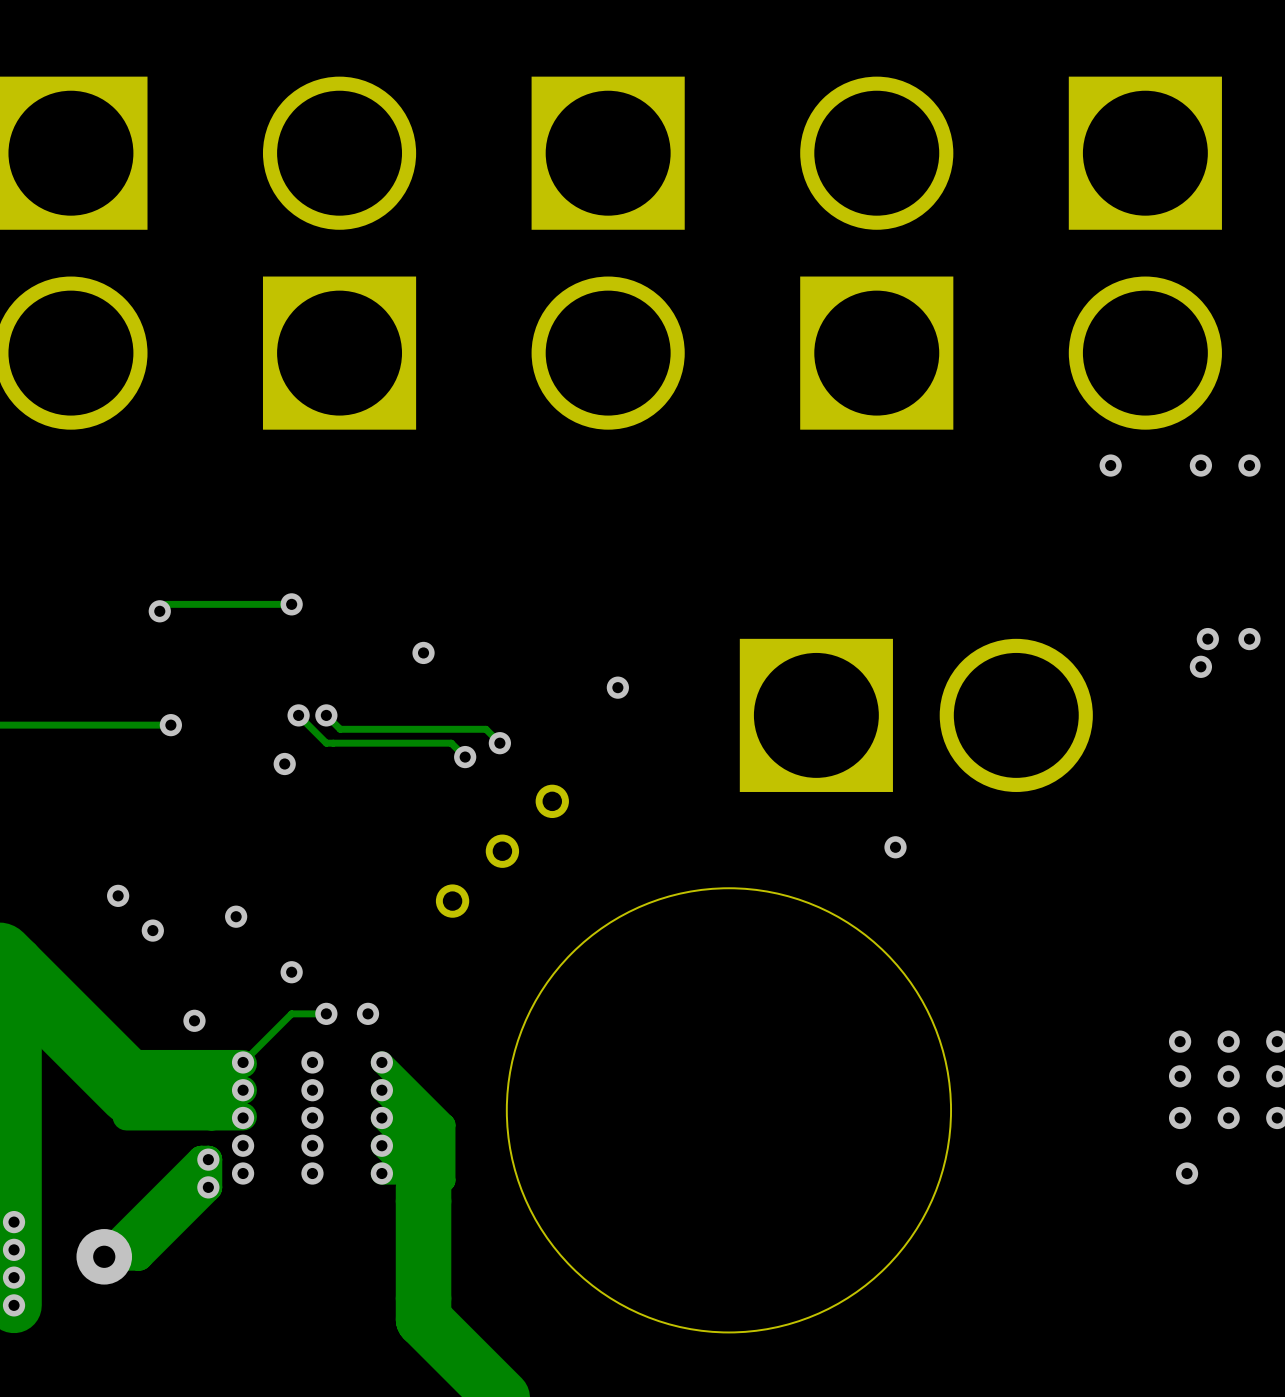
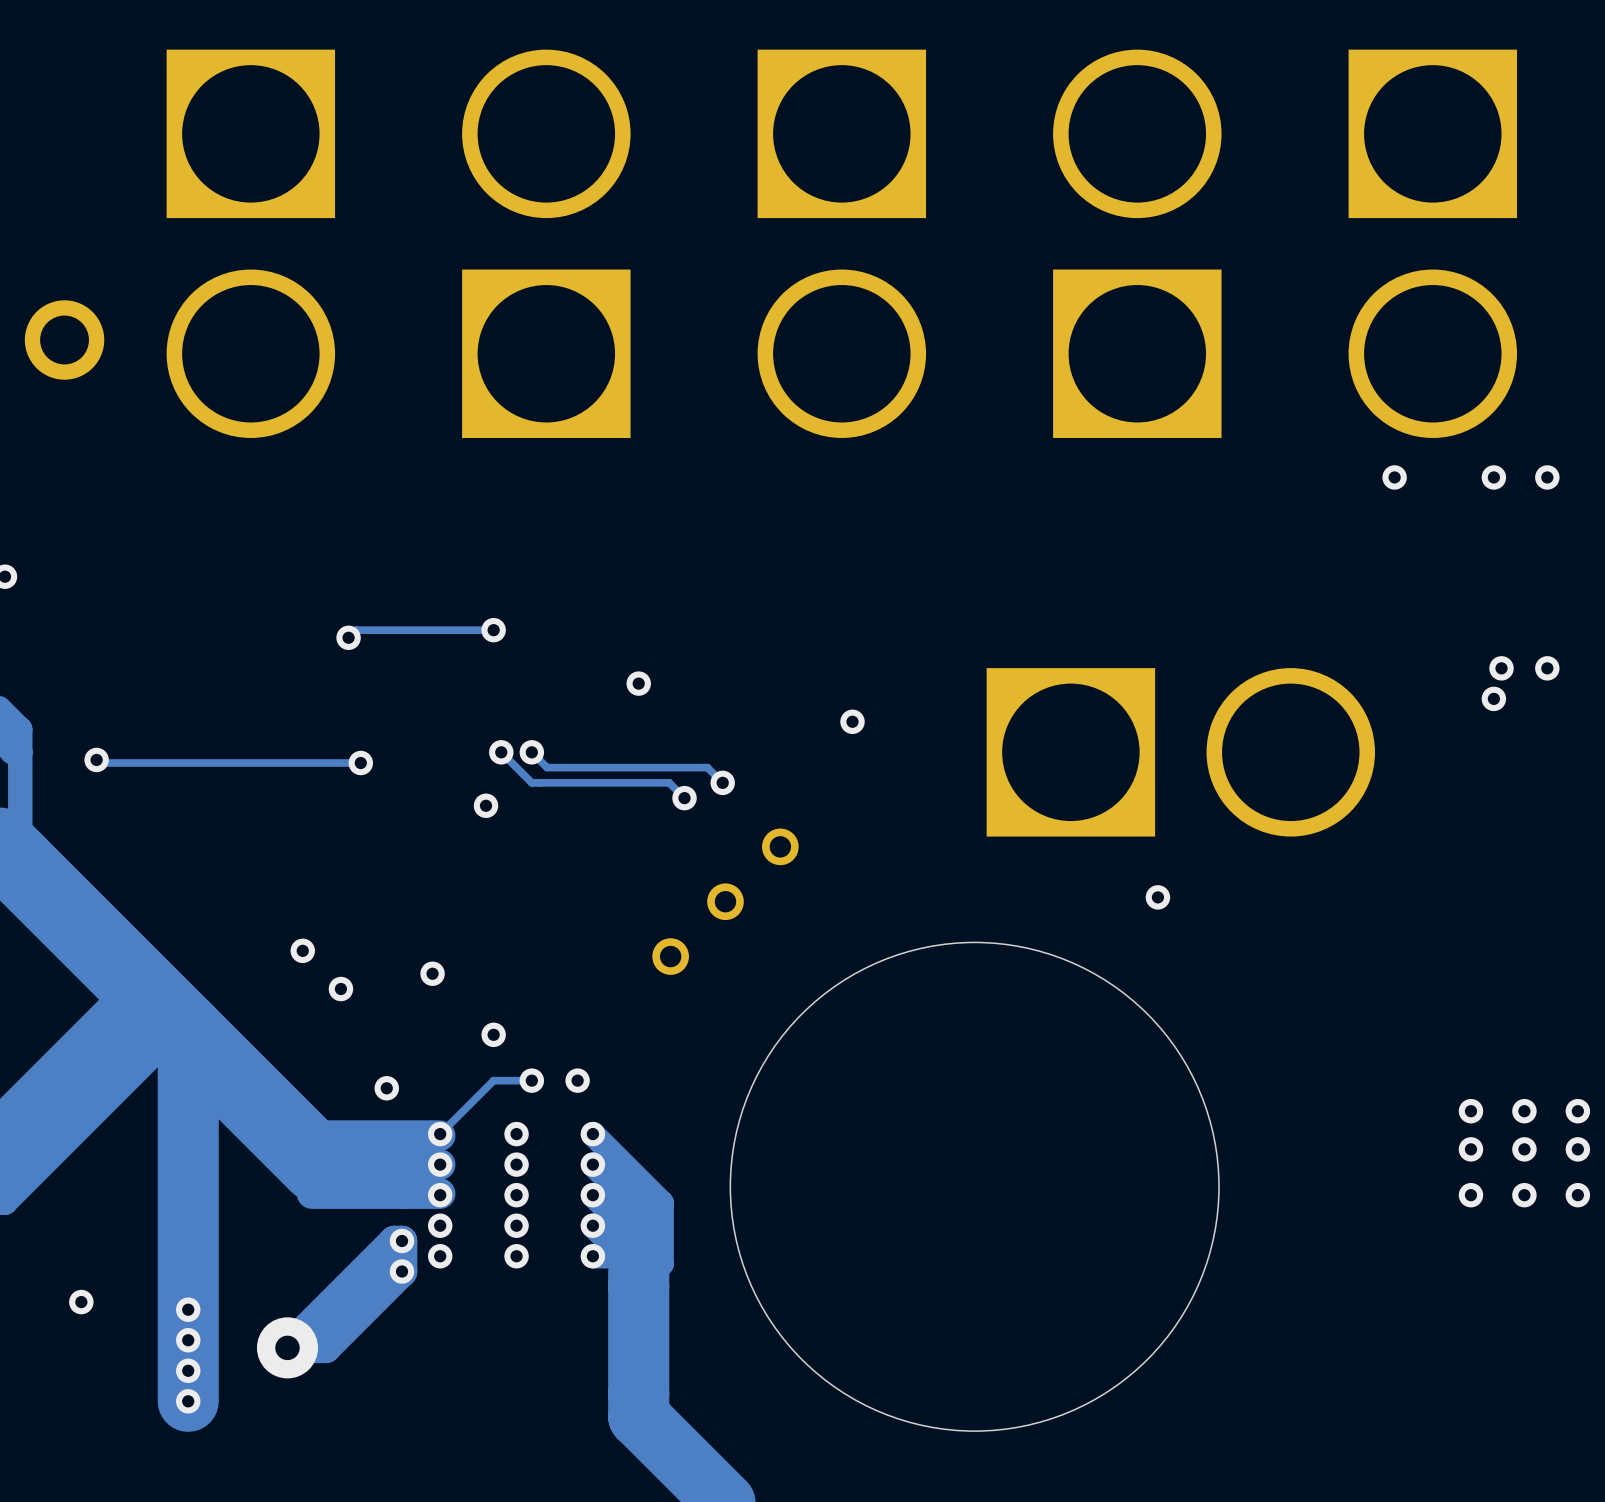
via: (1187, 1173) -> none

